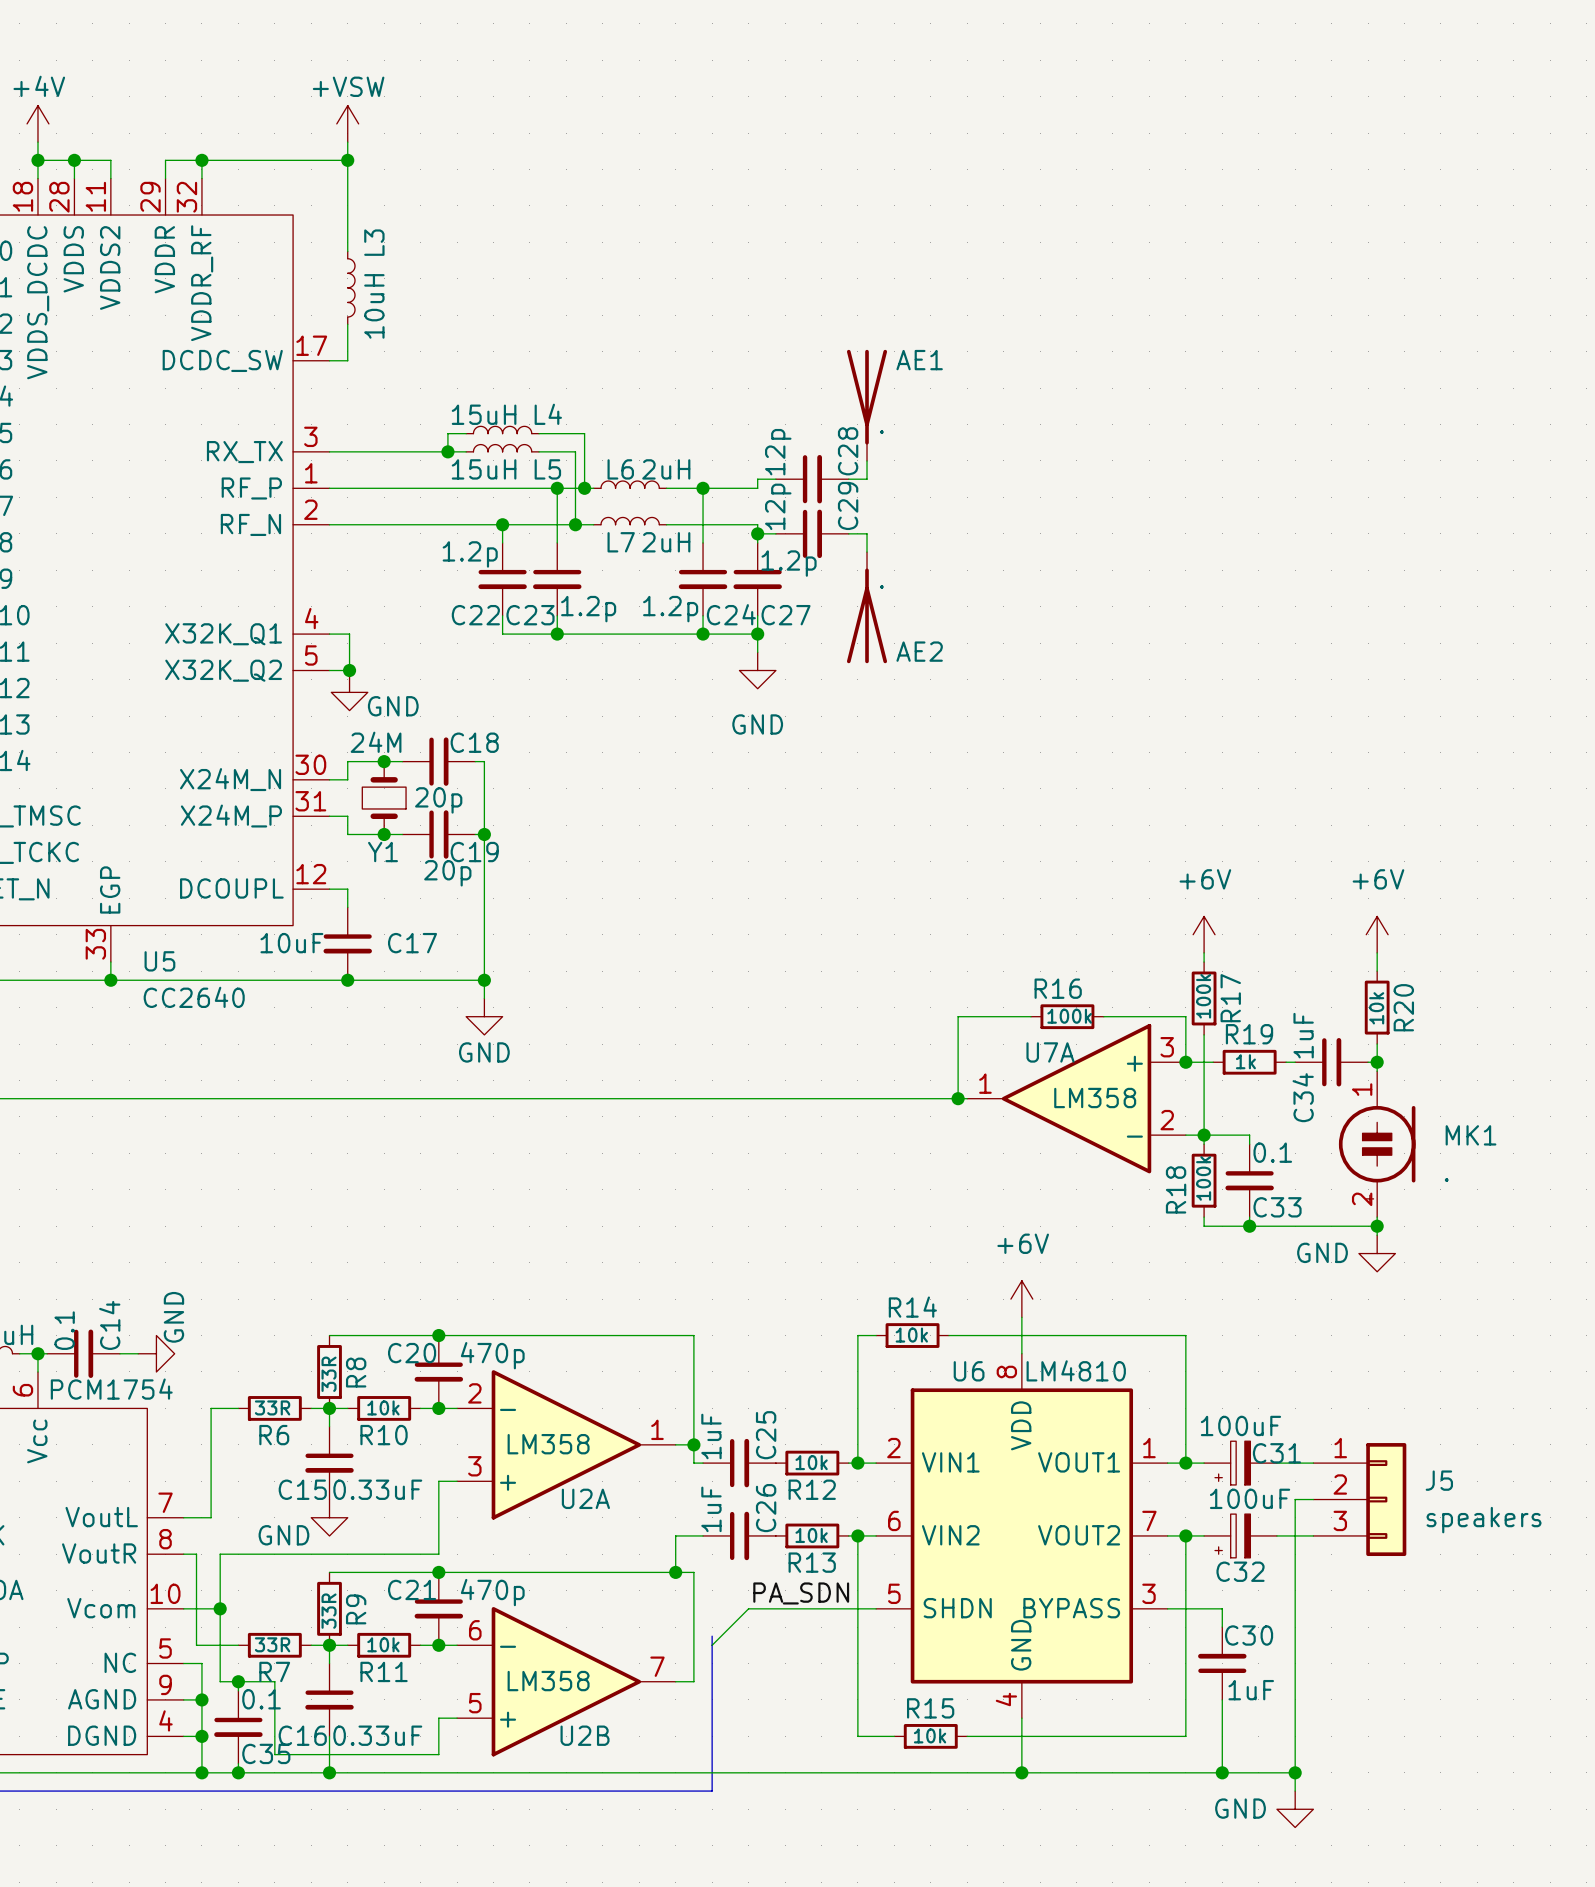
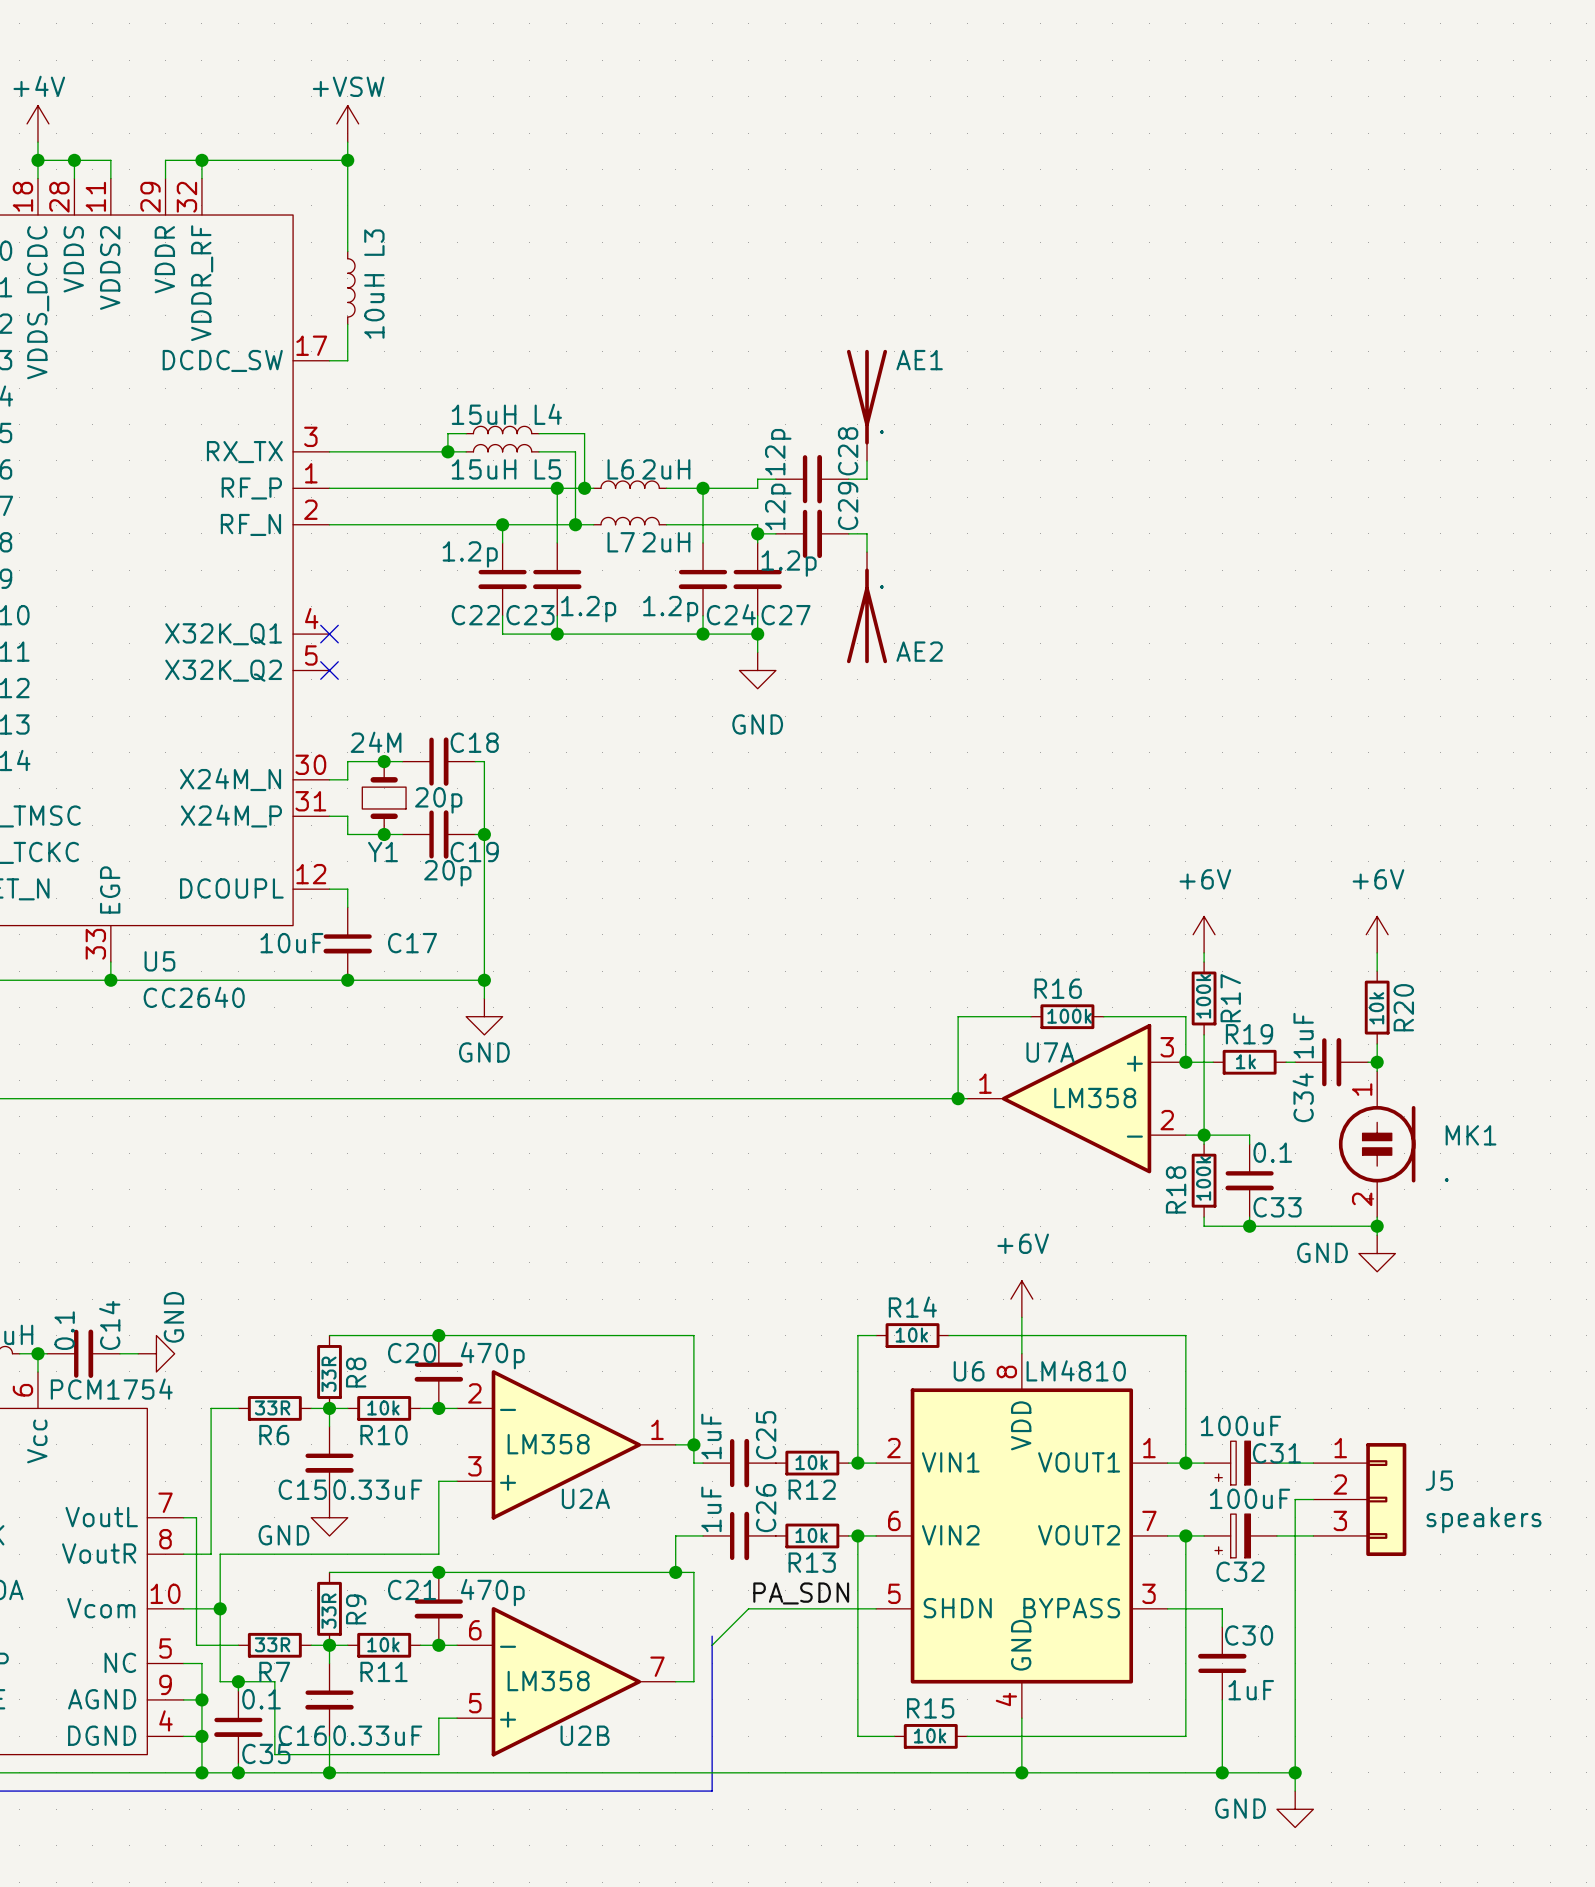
wire: (329, 634) (349, 634) (349, 674) -> none
no-connect mark: none -> (329, 634)
wire: (329, 670) (349, 670) -> none
no-connect mark: none -> (329, 670)
junction: (349, 670) -> none
power symbol: GND (349, 692) -> none
wire: (196, 1517) (211, 1517) -> (196, 1517) (196, 1554) (211, 1554) (211, 1517)

